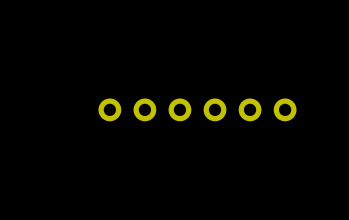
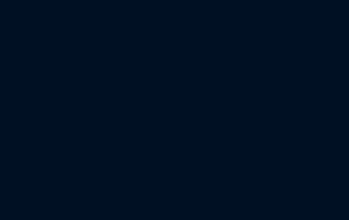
part: (197, 109) -> none

